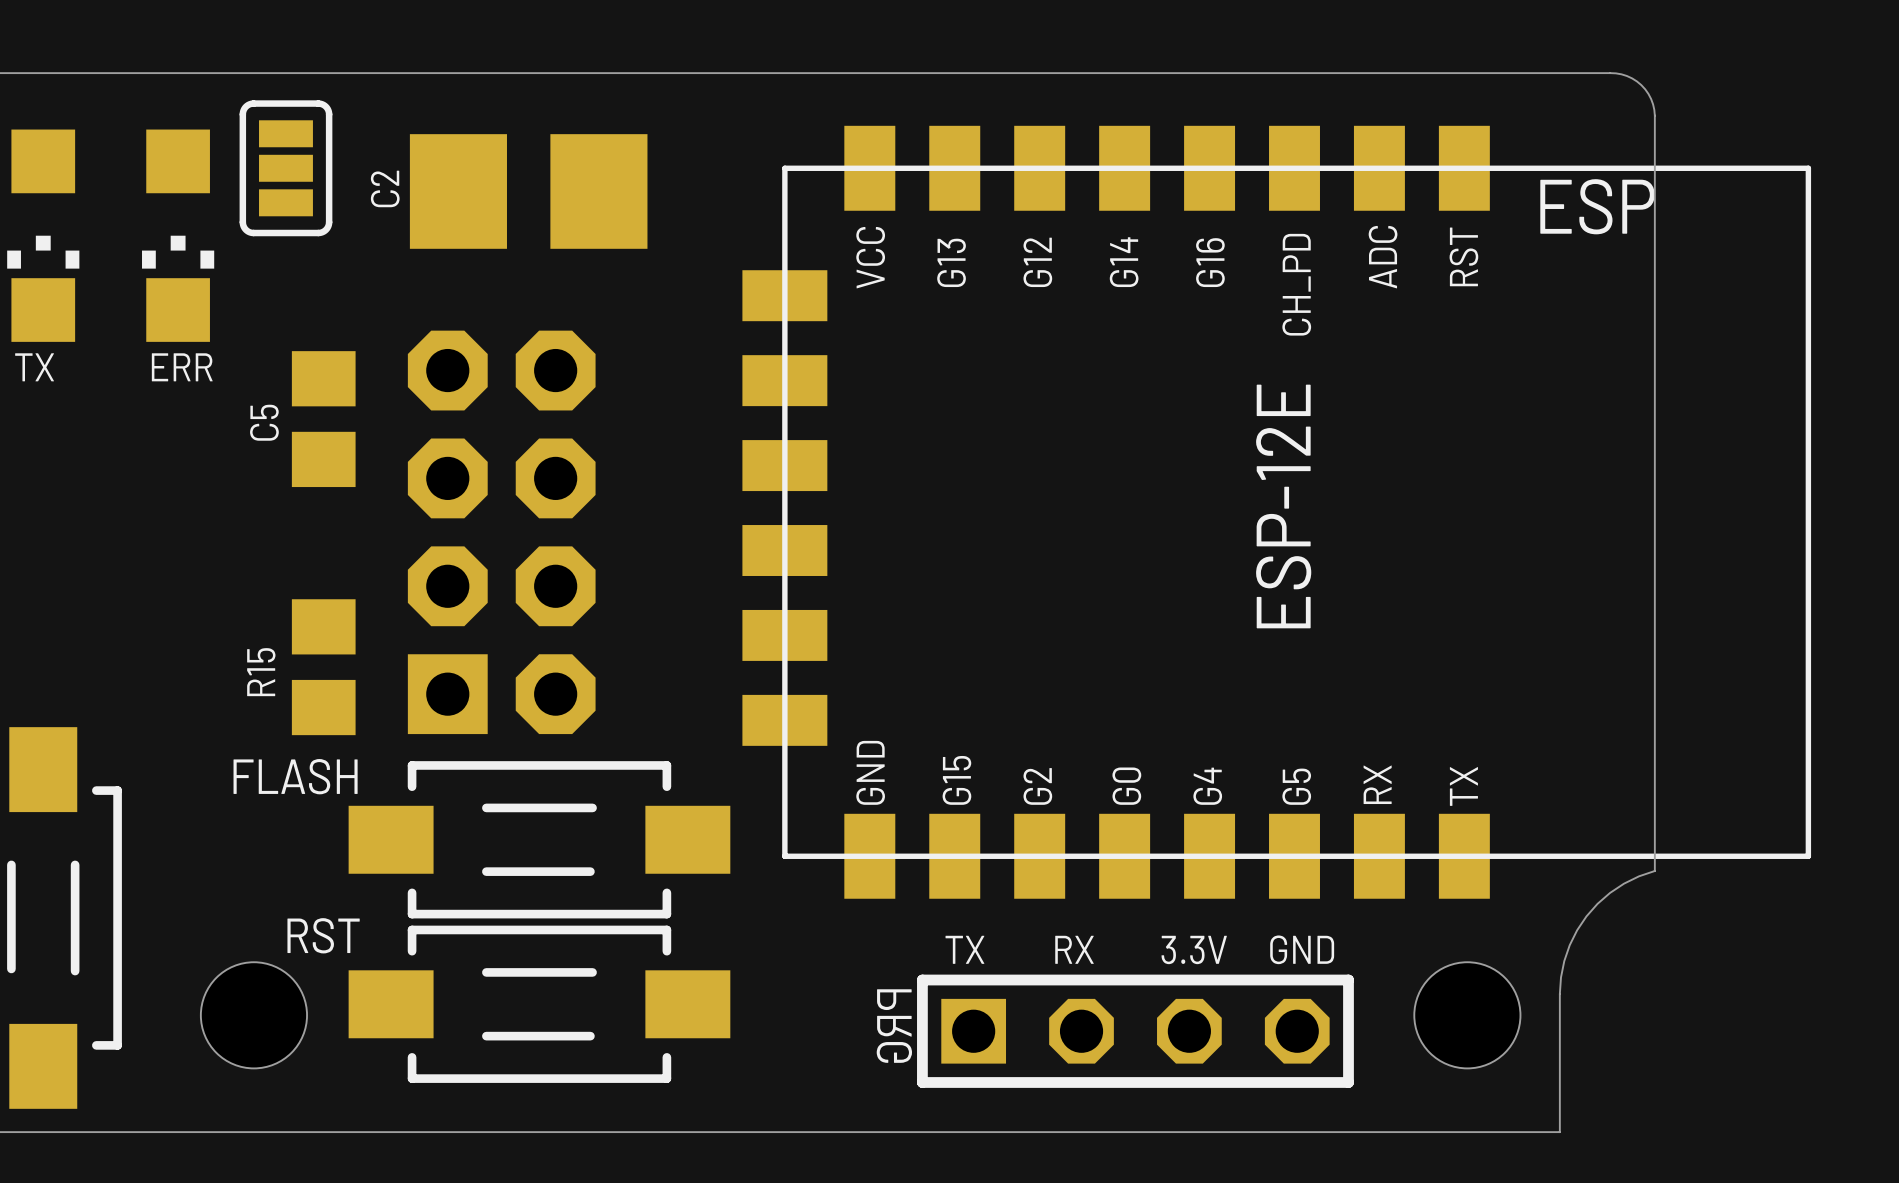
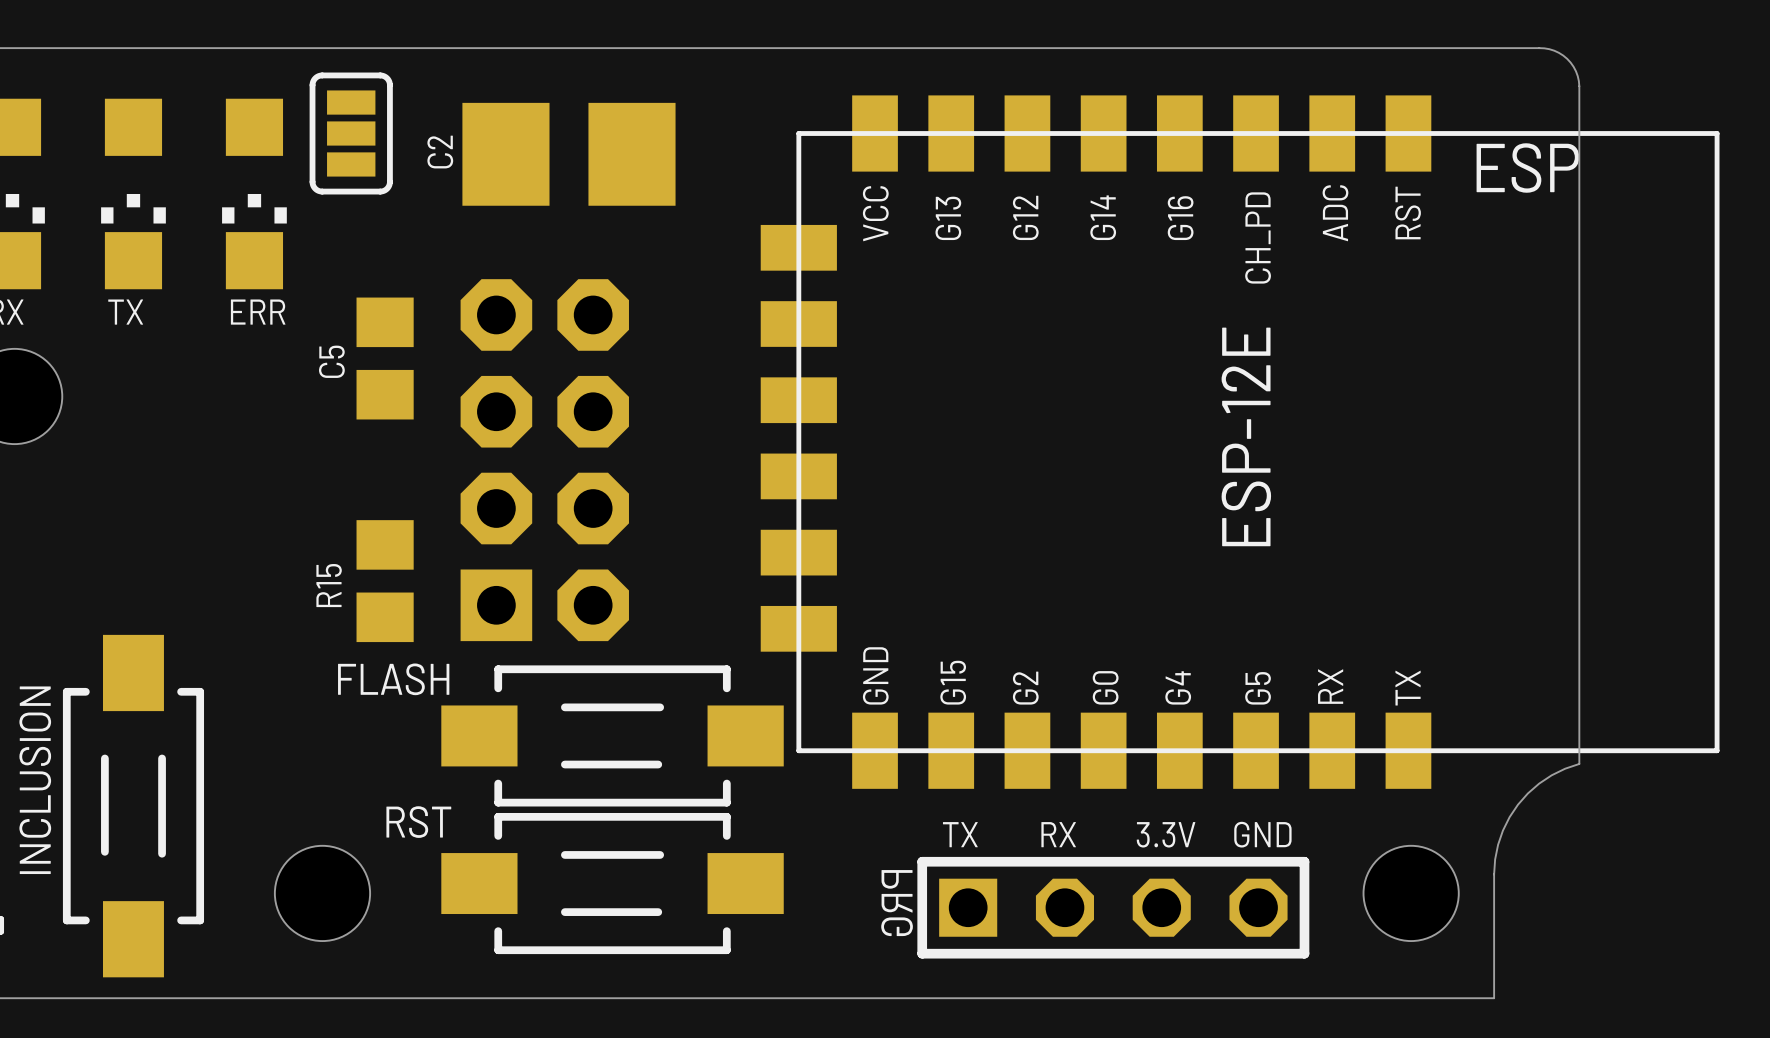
FLASH position: (539, 839) -> (612, 735)
RST position: (539, 1004) -> (612, 883)

